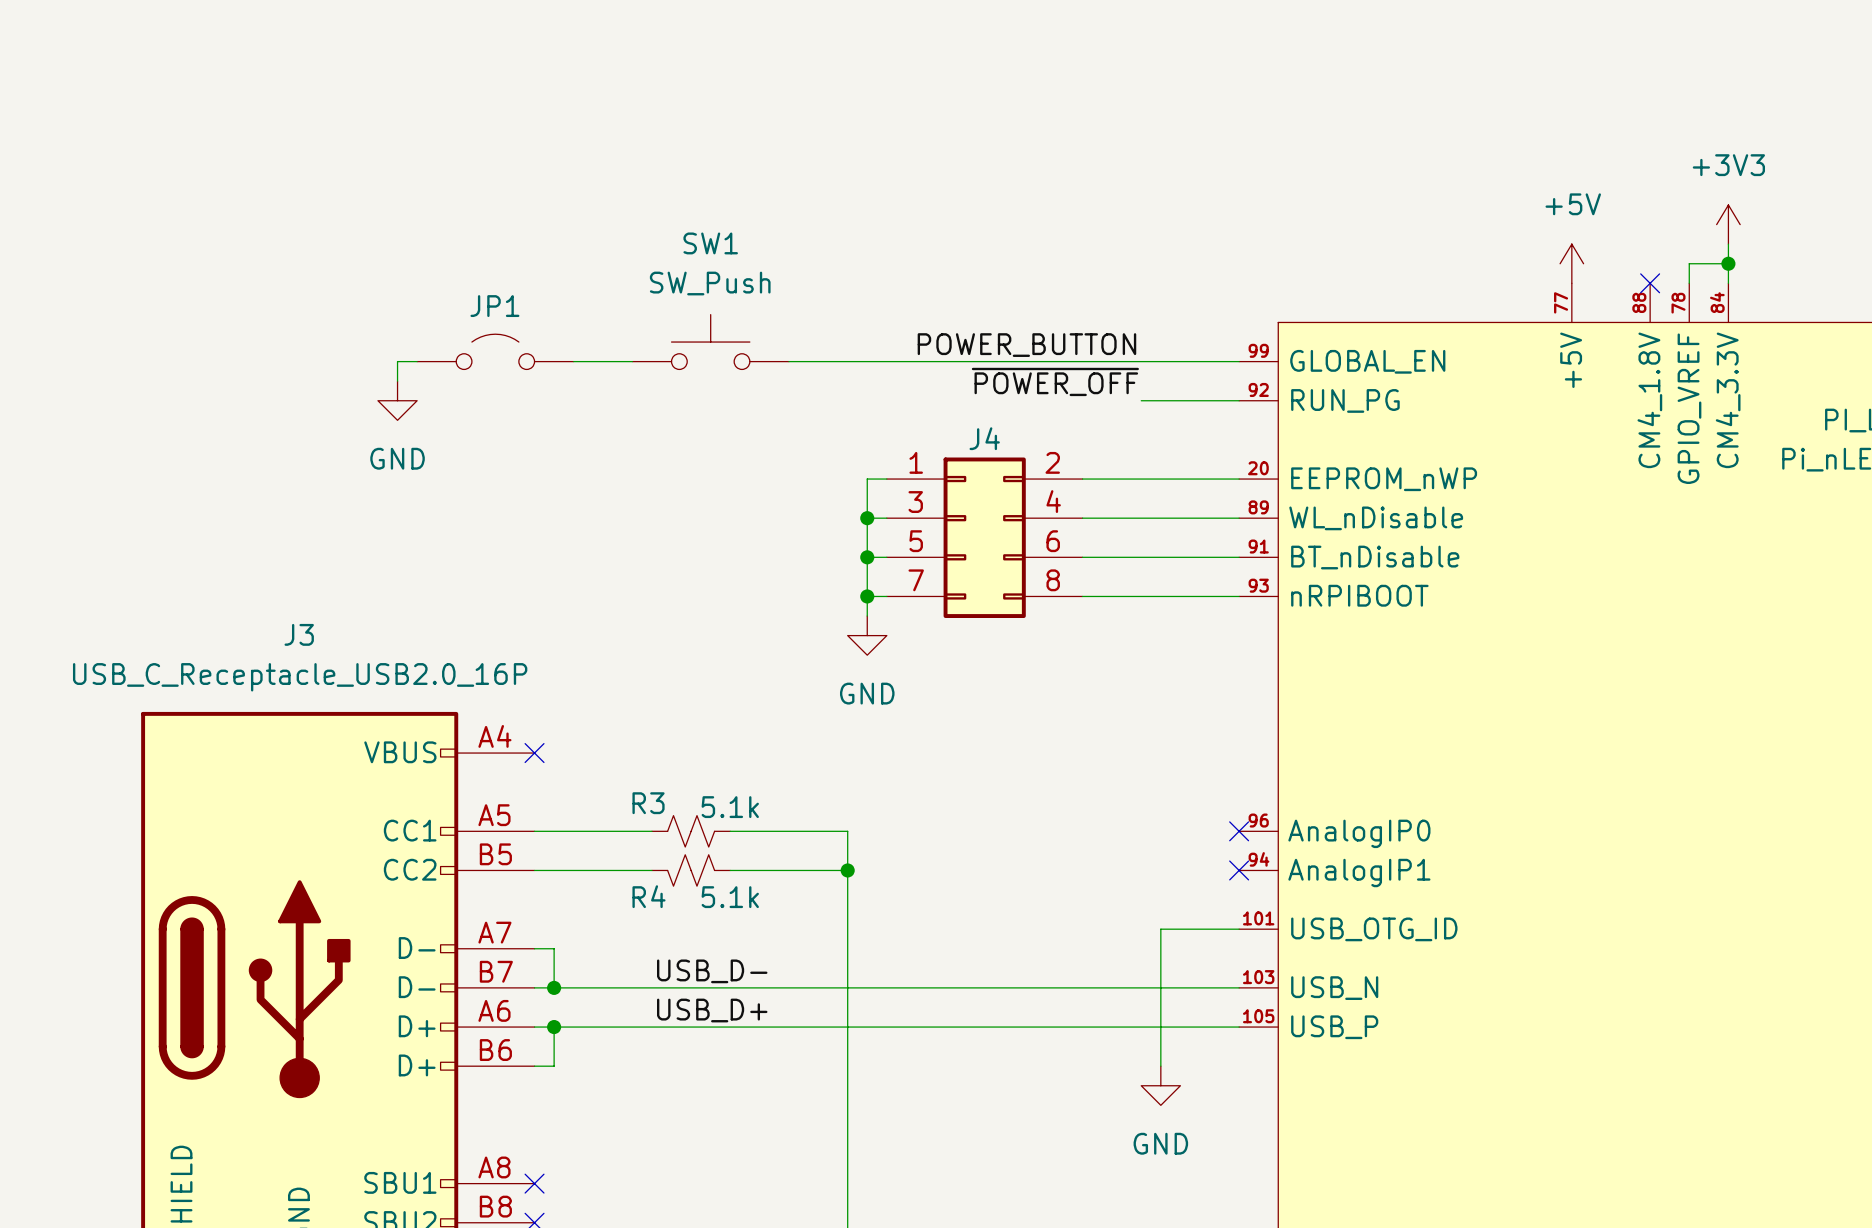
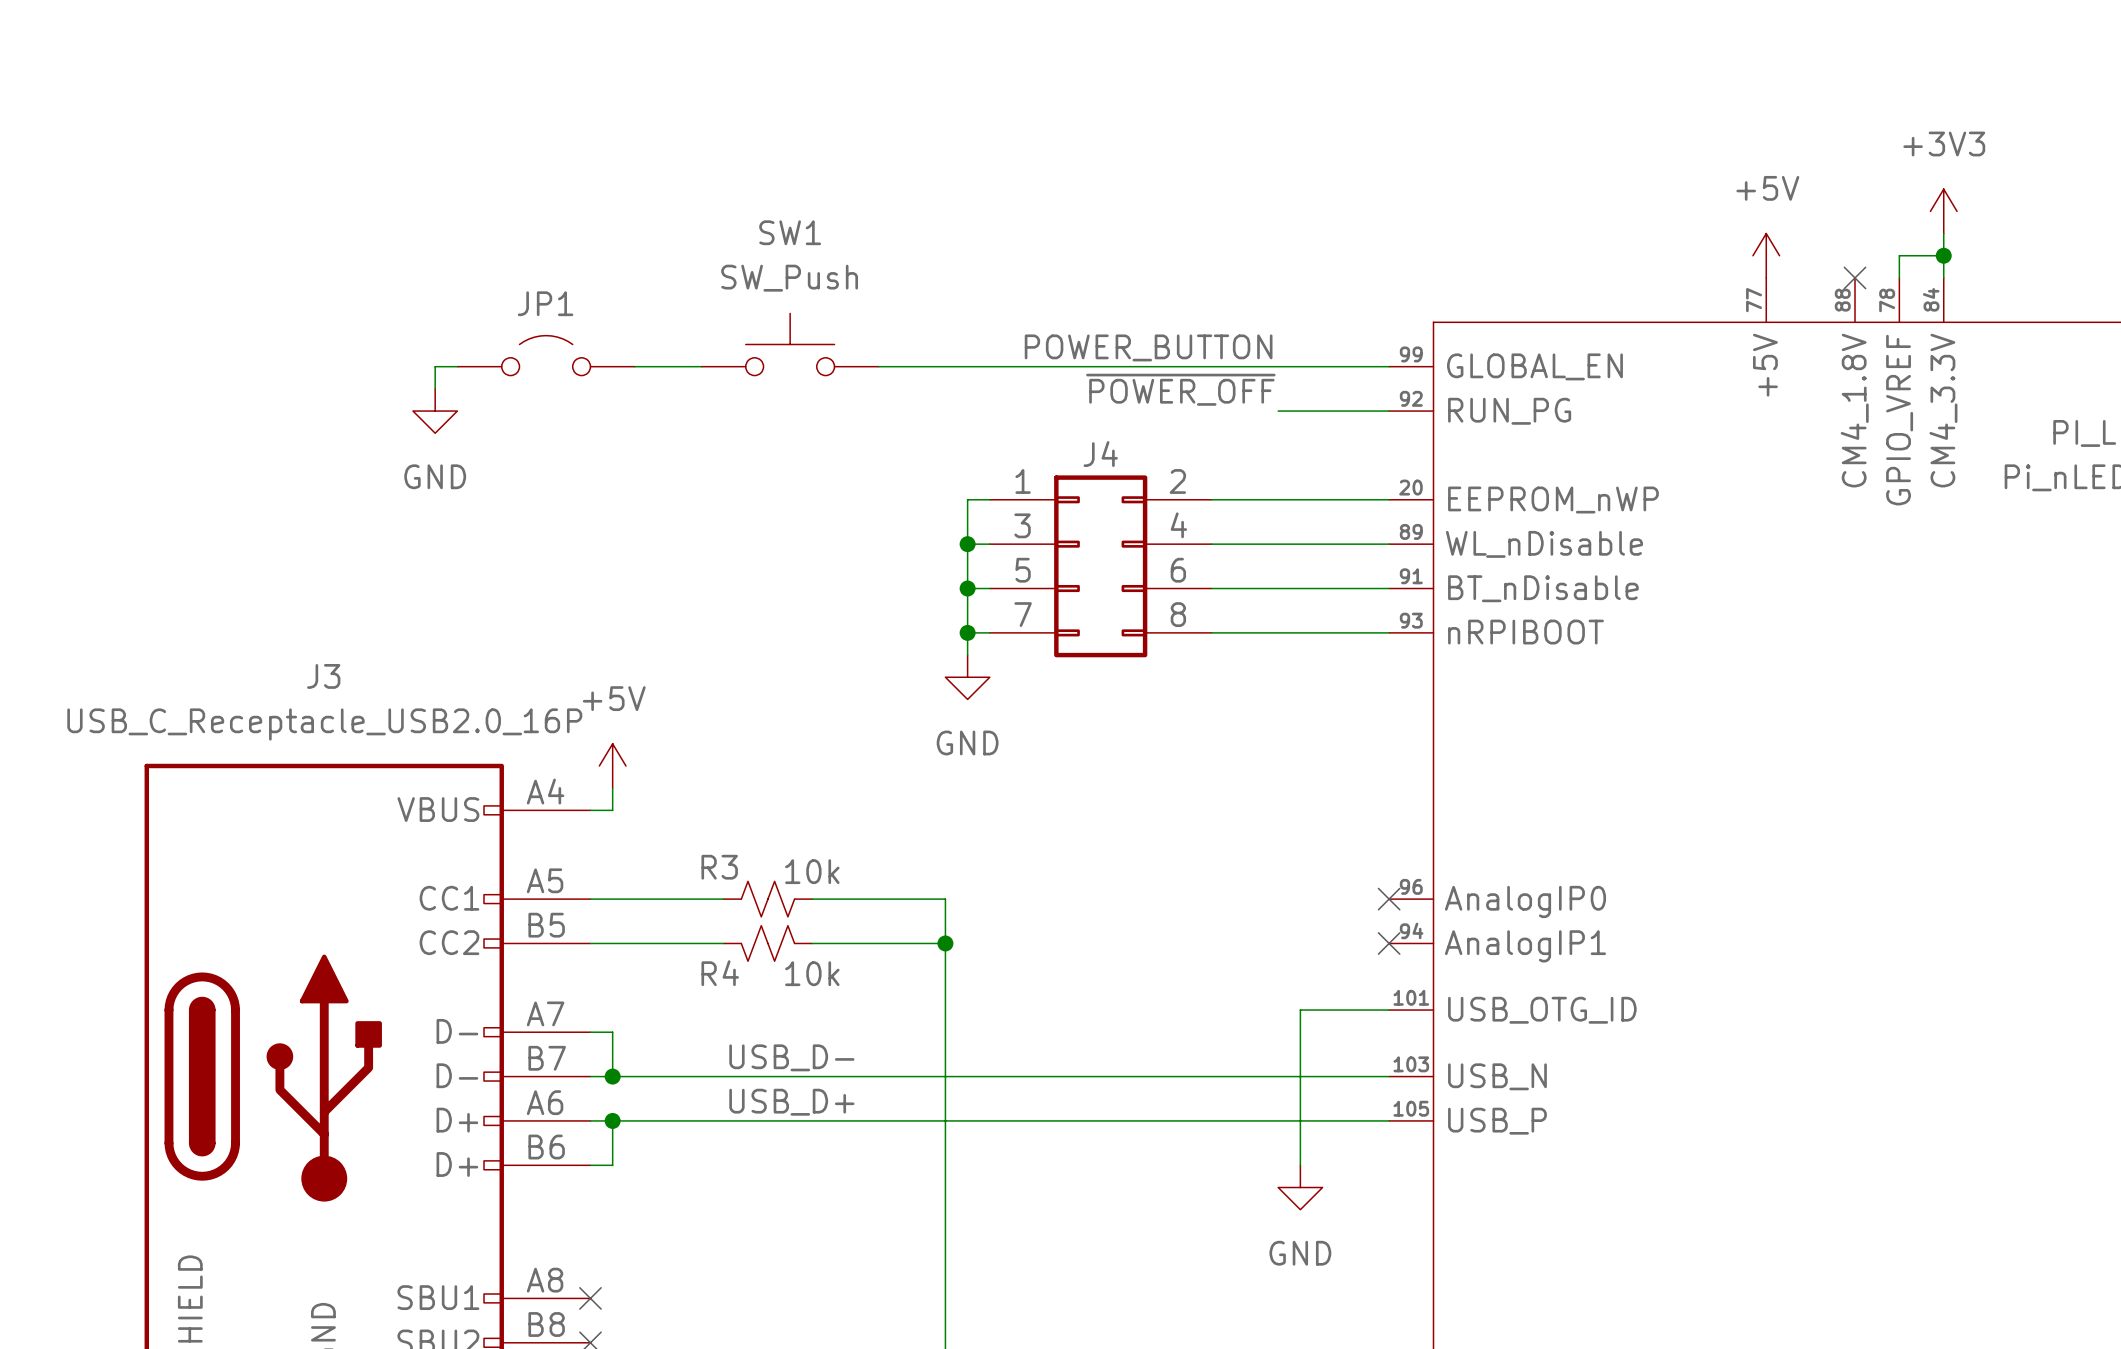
power symbol: none -> +5V (612, 766)
wire: none -> (612, 788) (612, 810) (590, 810)
no-connect mark: (534, 753) -> none
R3 value: 5.1k (730, 807) -> 10k (812, 871)
R4 value: 5.1k (730, 897) -> 10k (812, 973)

